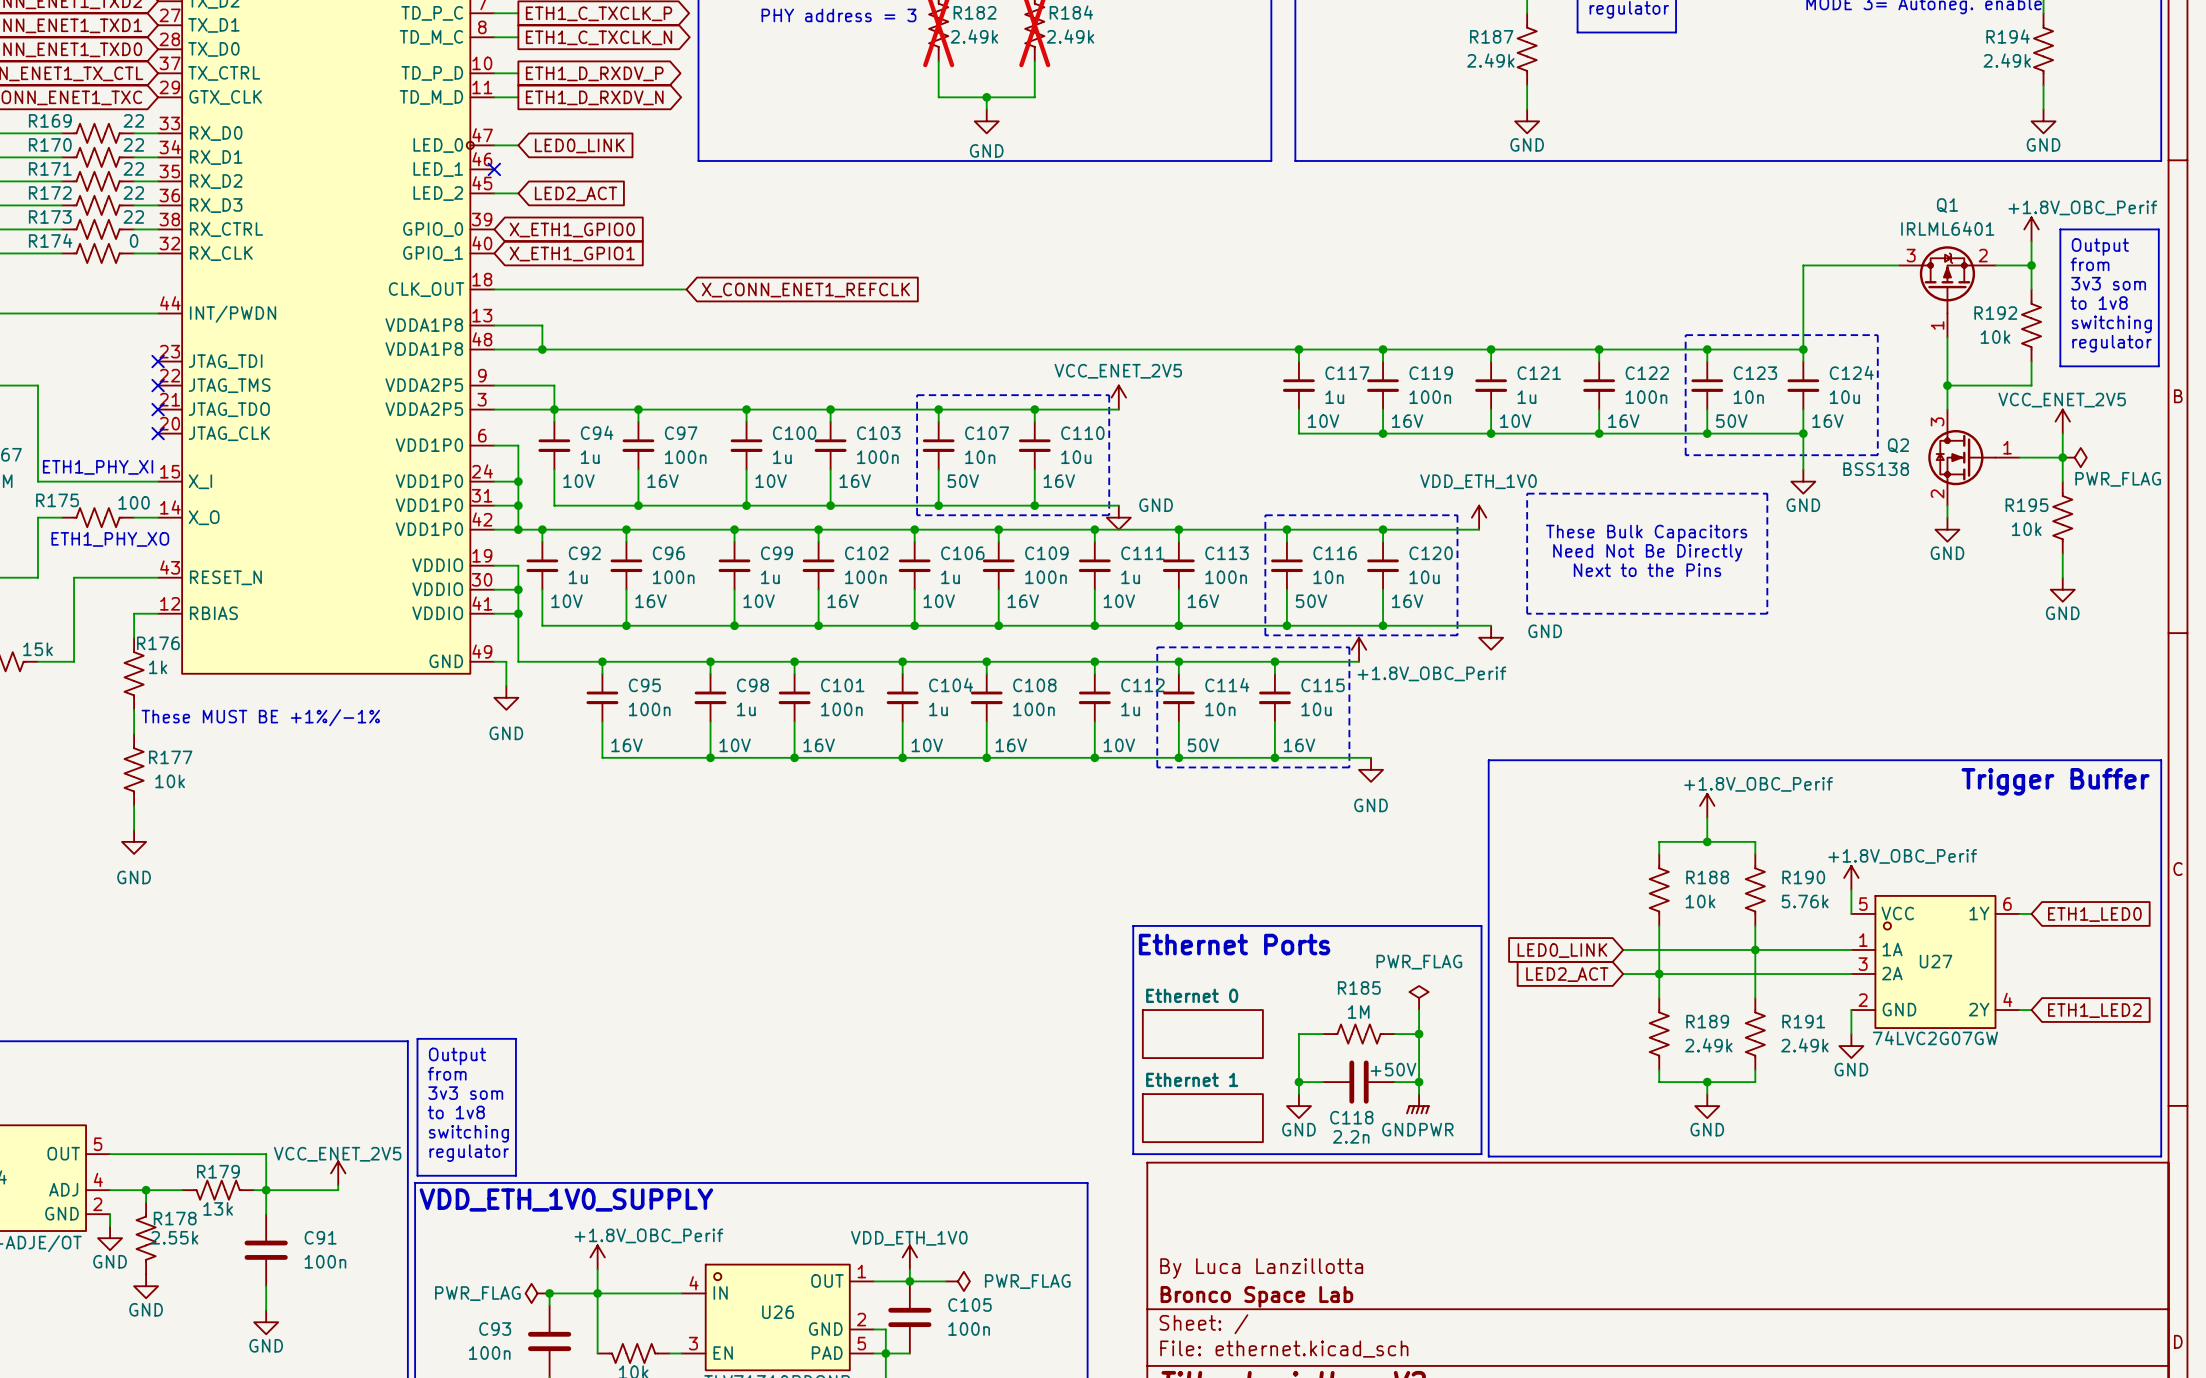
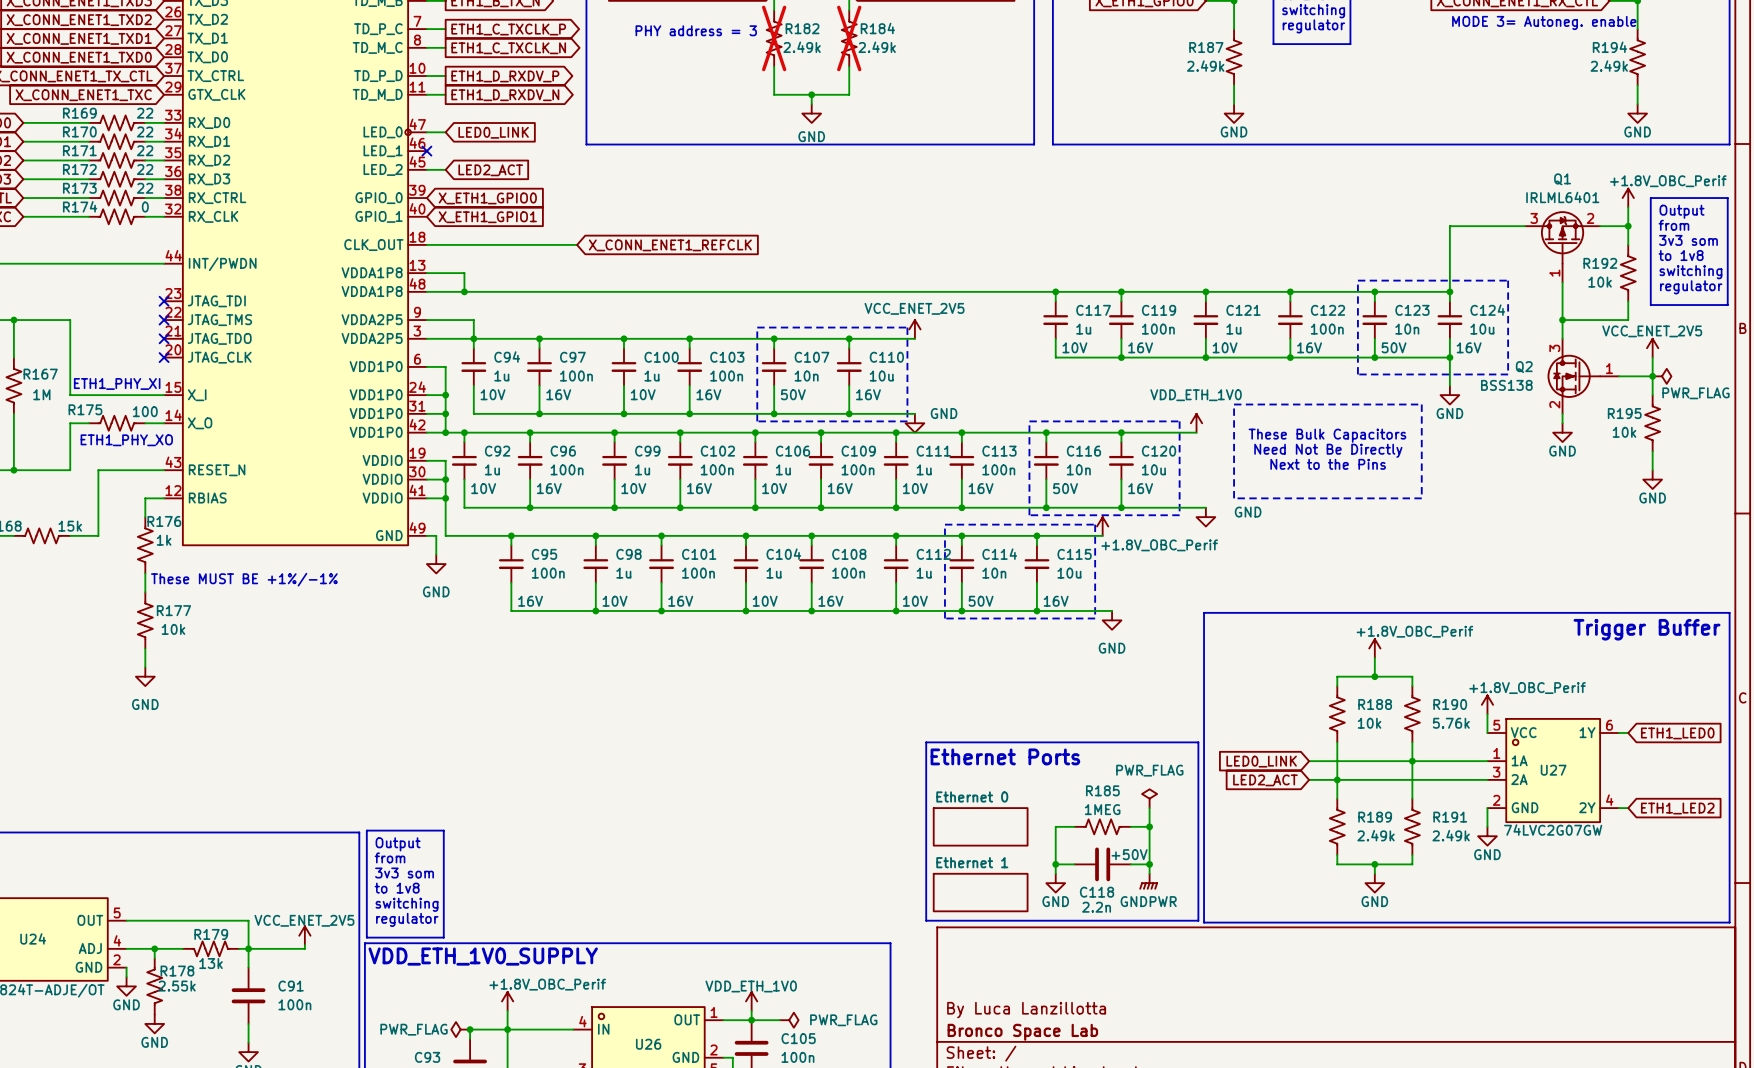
R185 value: 1M (1358, 1011) -> 1MEG (1102, 809)

